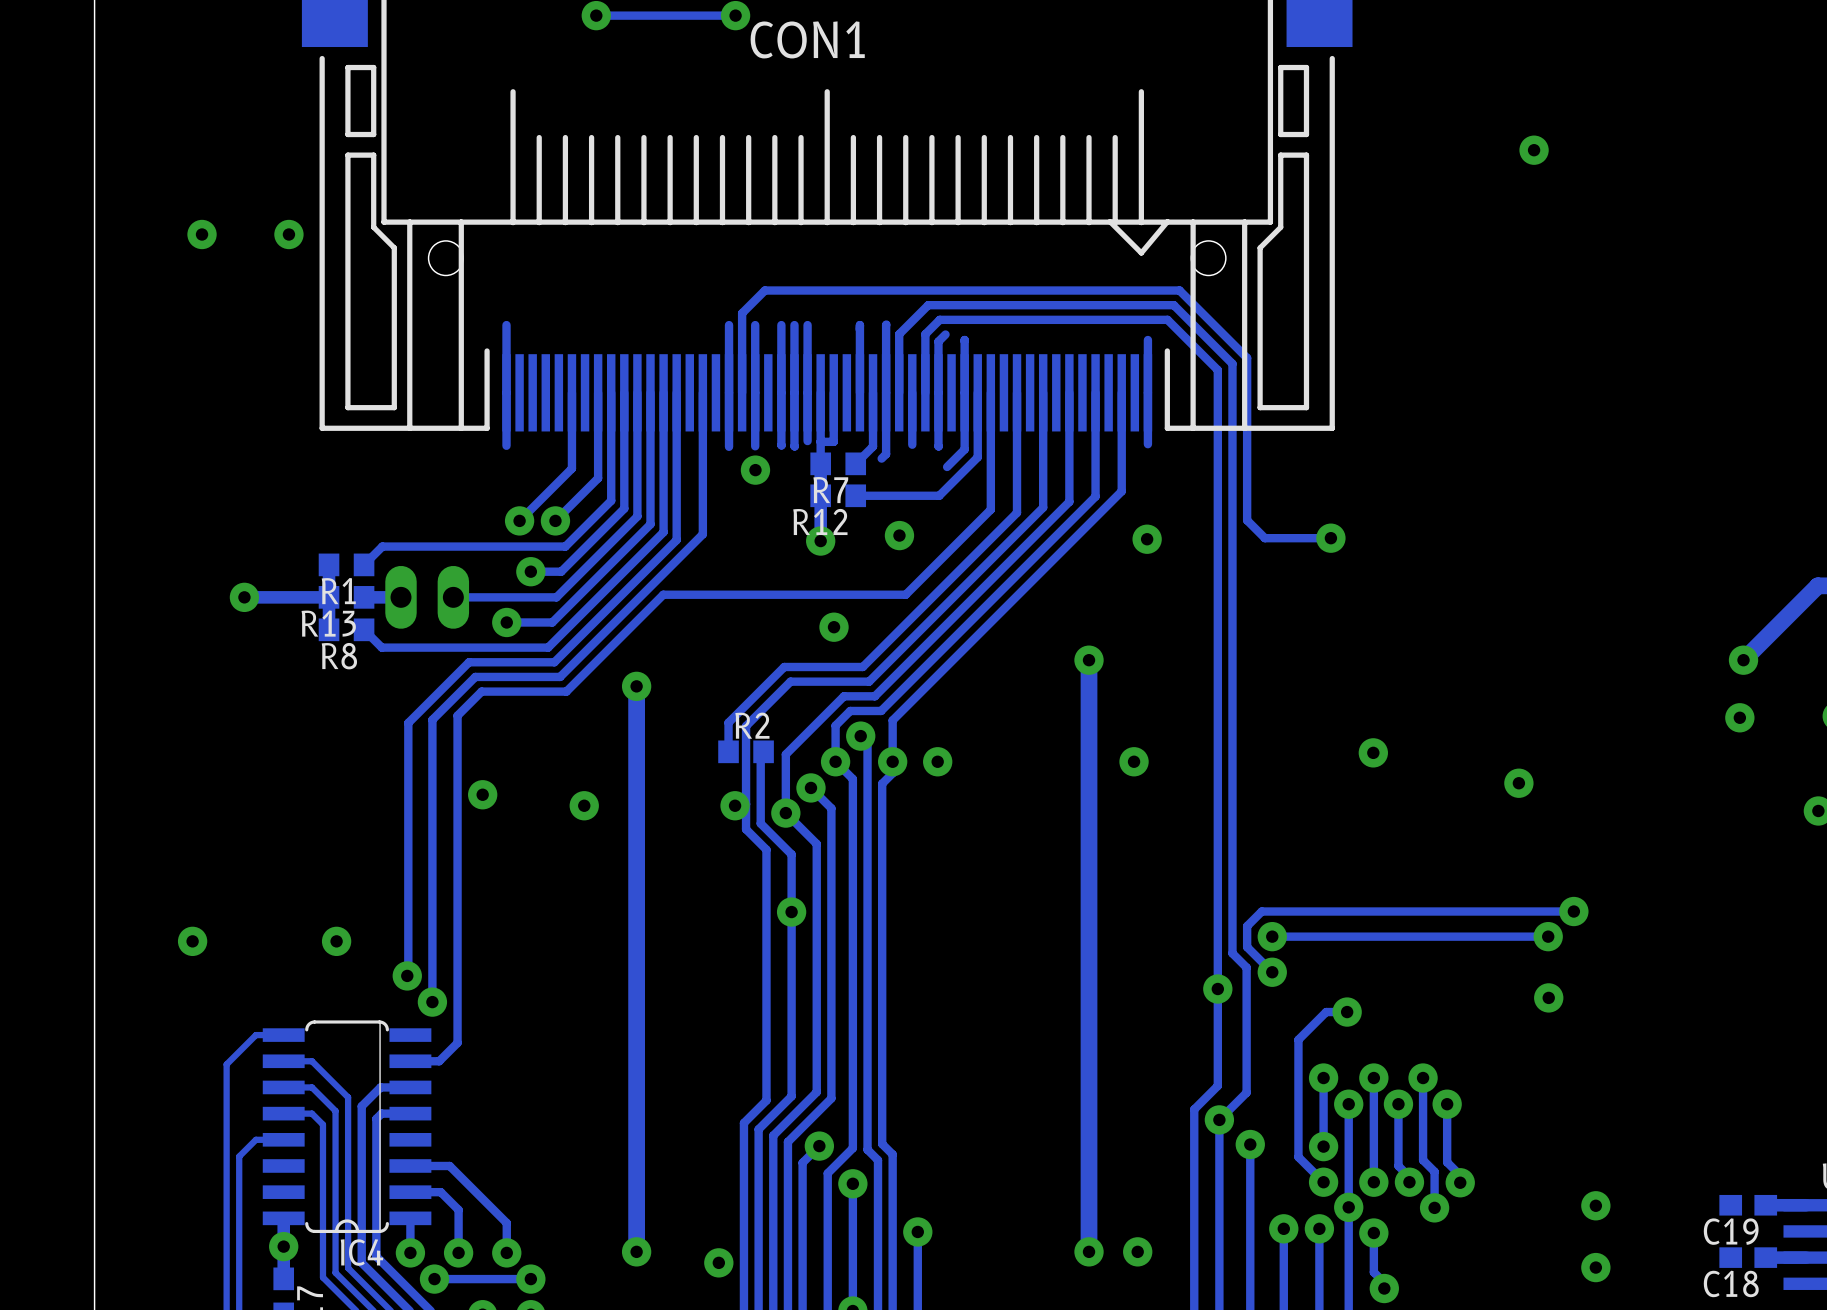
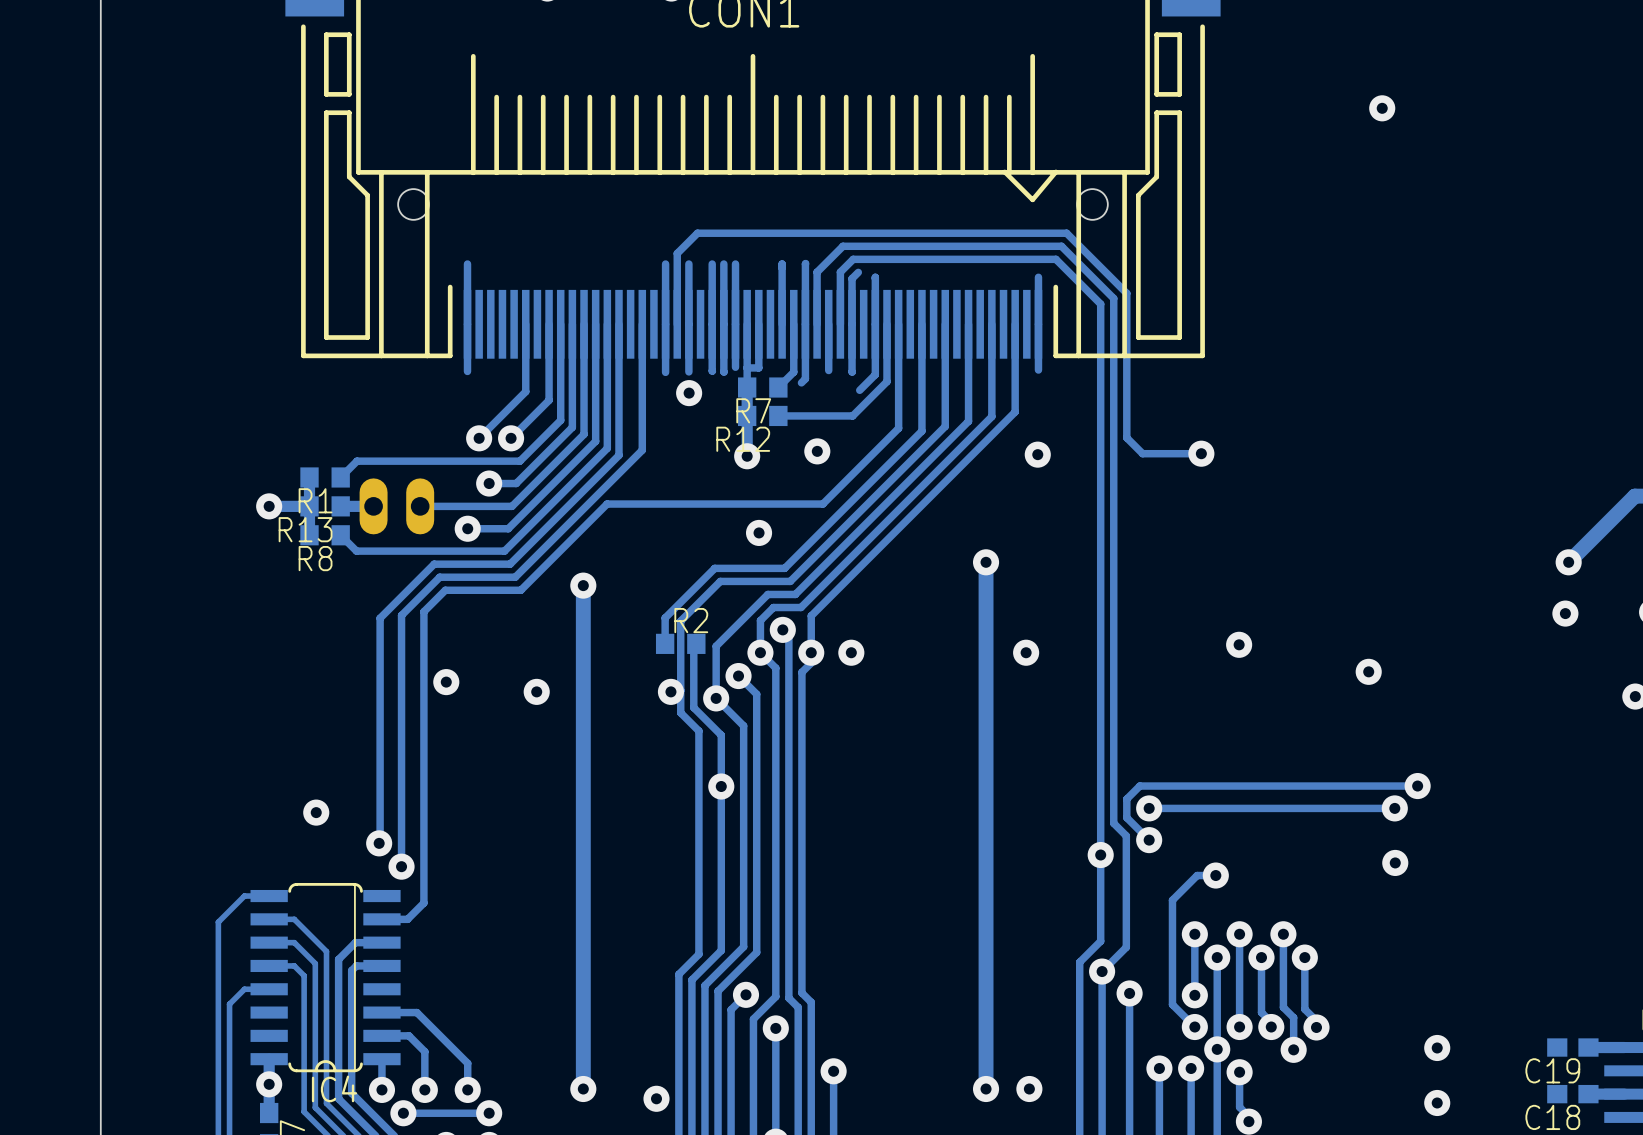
via: (202, 234) -> none
via: (288, 234) -> none
via position: (244, 597) -> (269, 506)
track: (283, 597) (244, 597) -> none
via: (192, 941) -> none

